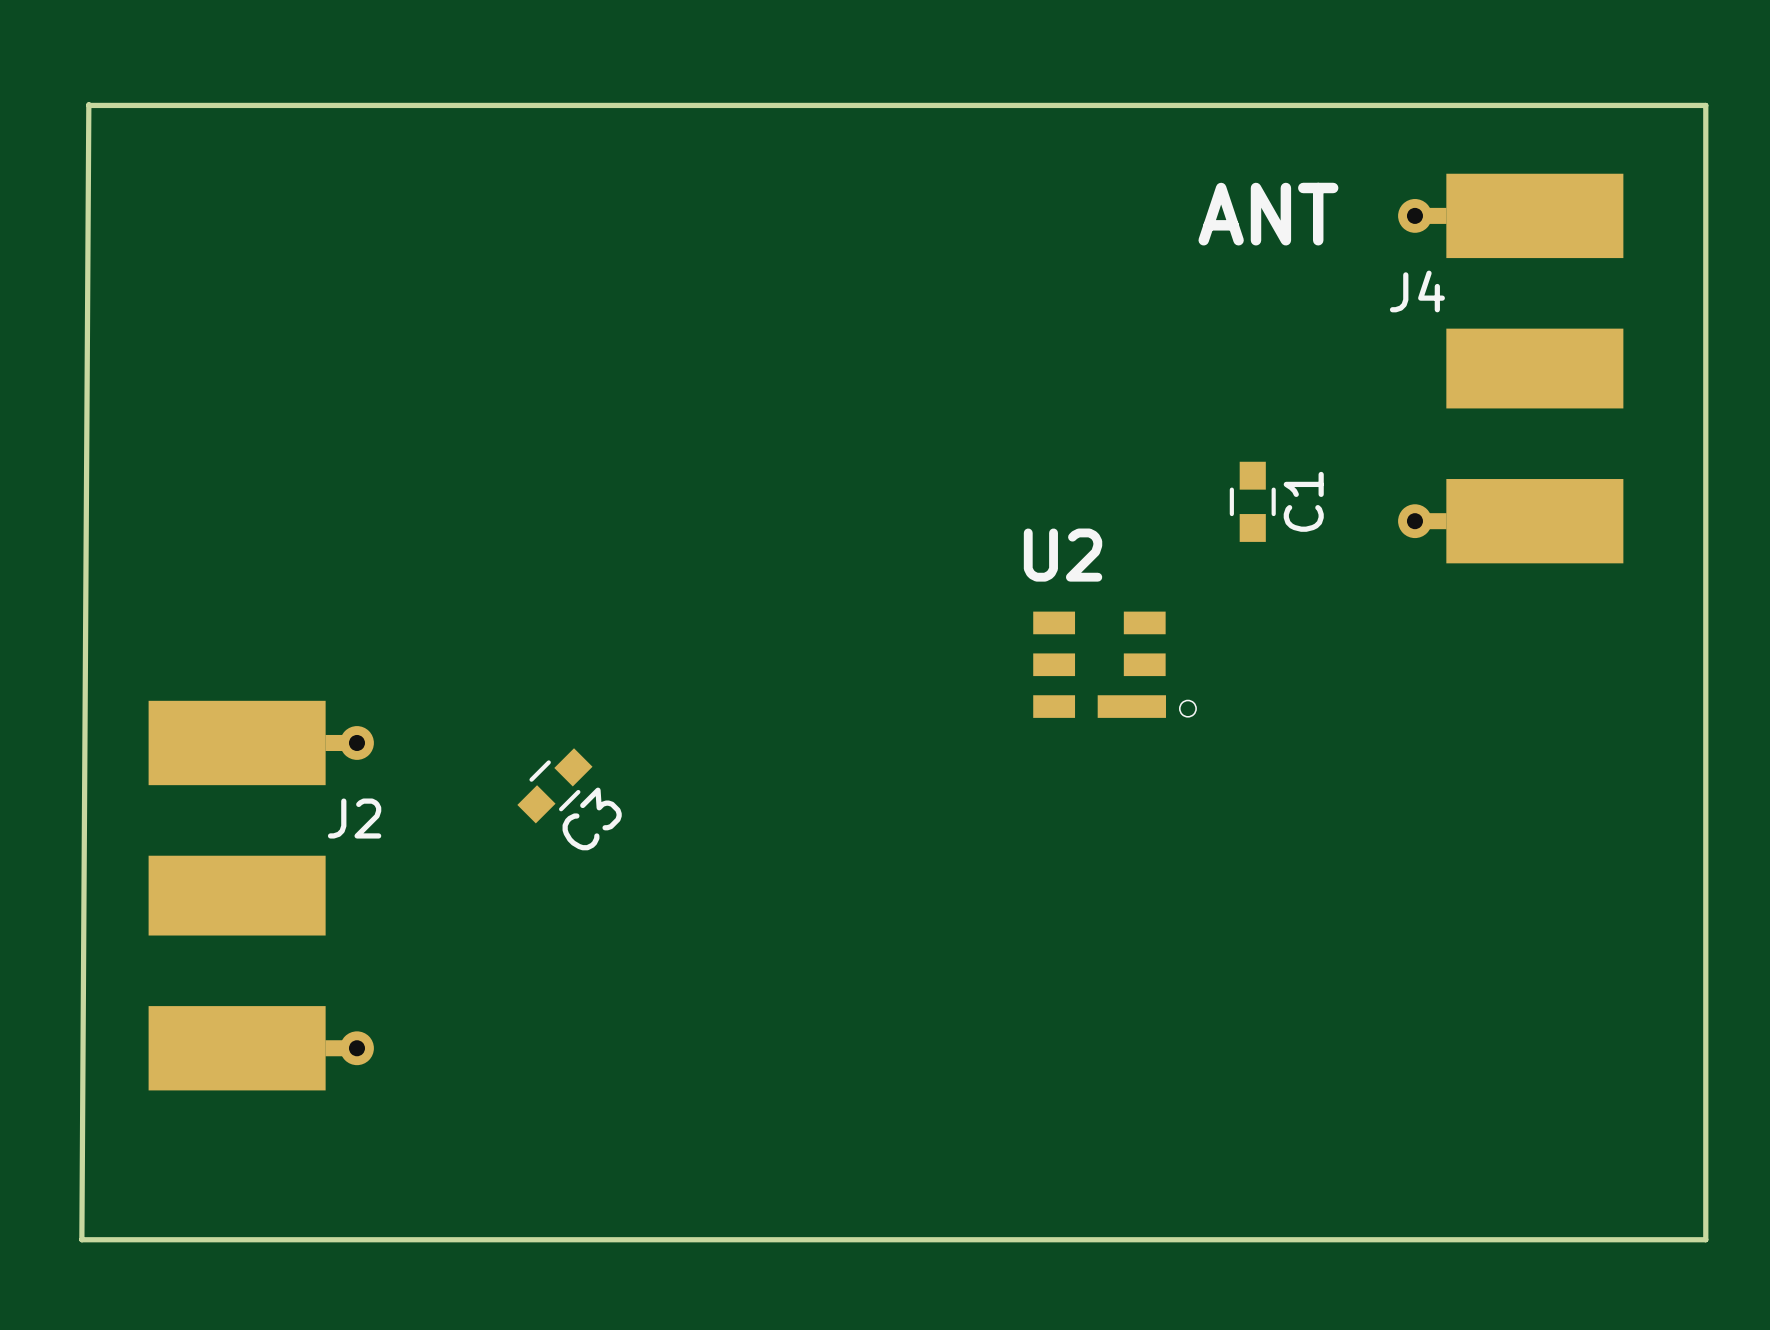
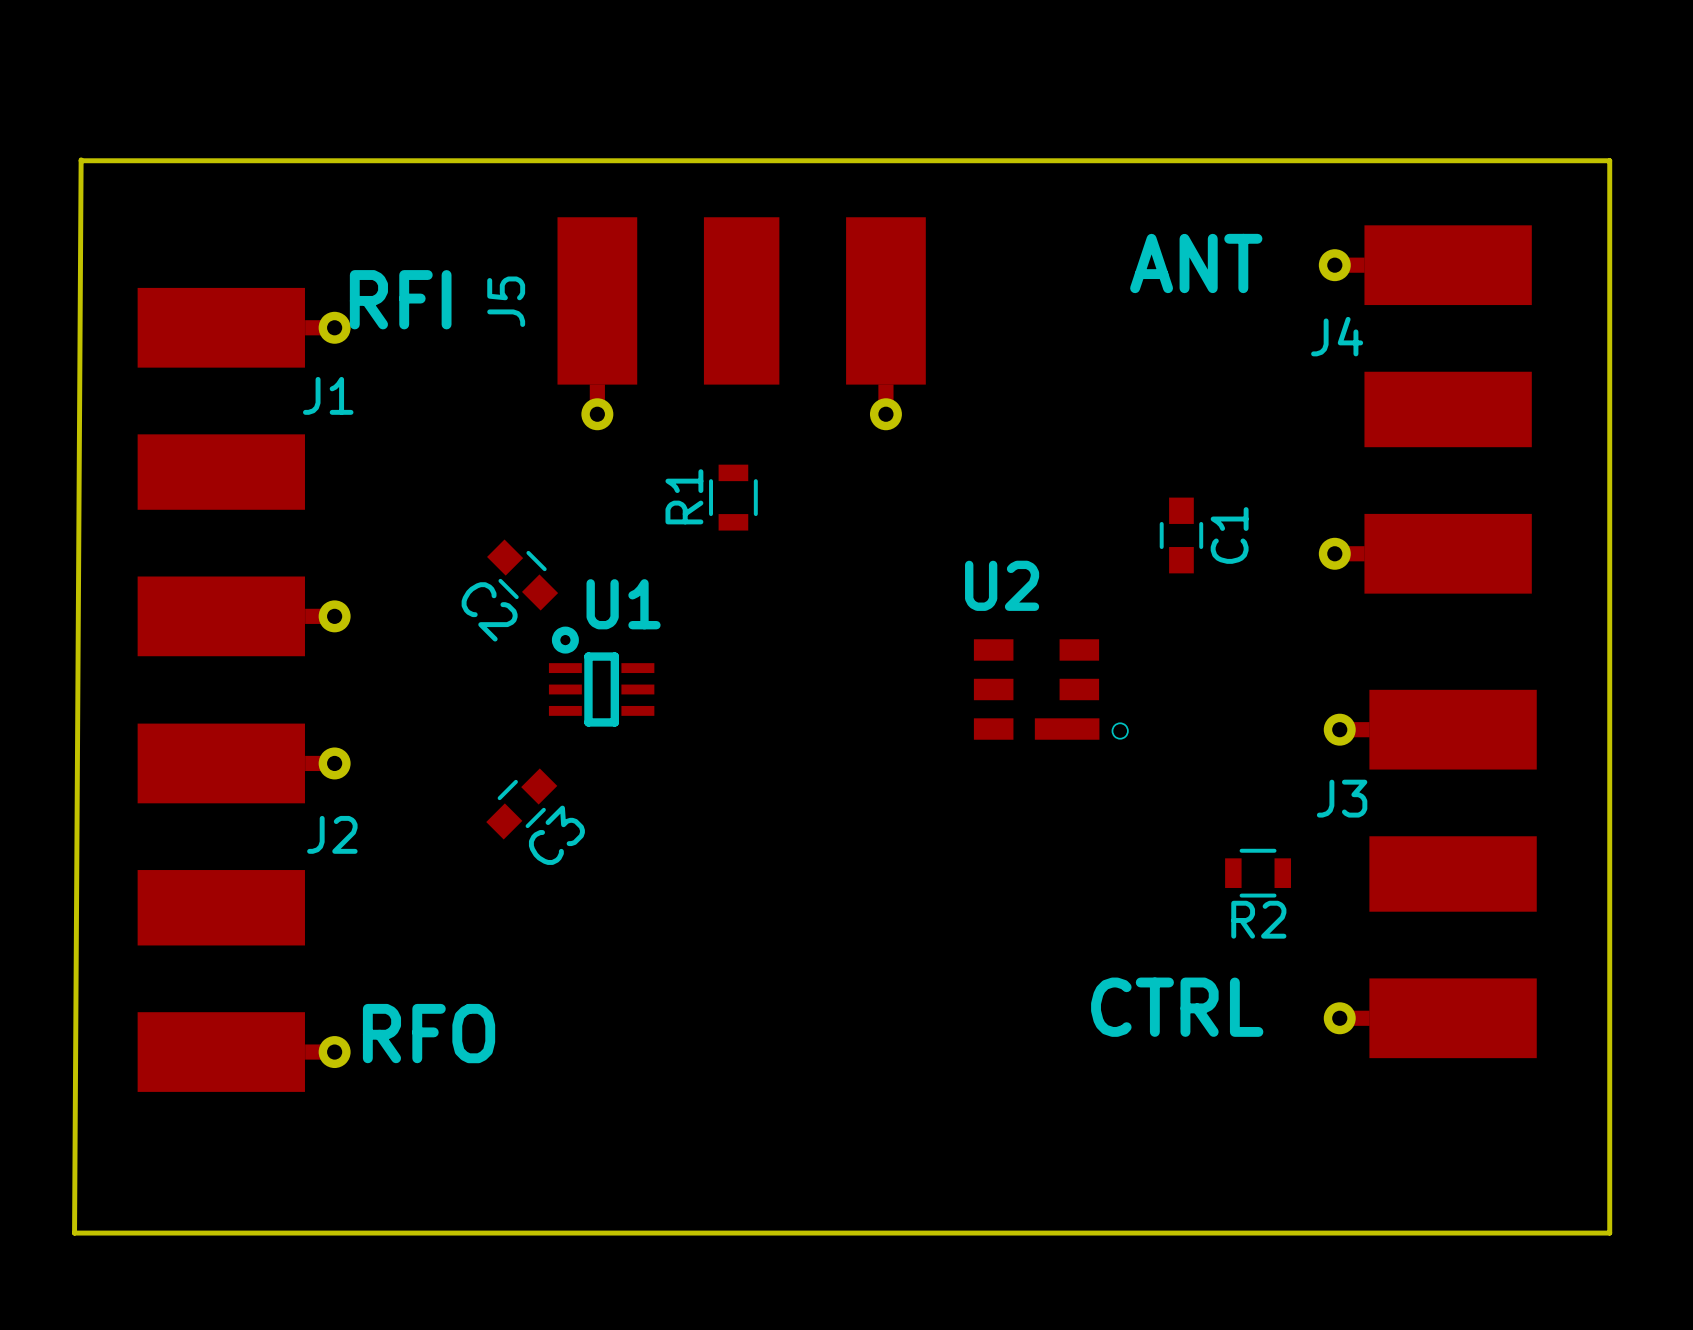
text: none -> RFI (400, 299)
J5: none -> (741, 323)
J1: none -> (244, 472)
R1: none -> (733, 497)
C2: none -> (522, 575)
U1: none -> (601, 676)
R2: none -> (1258, 873)
J3: none -> (1430, 873)
text: none -> CTRL (1177, 1007)
text: none -> RFO (429, 1033)

